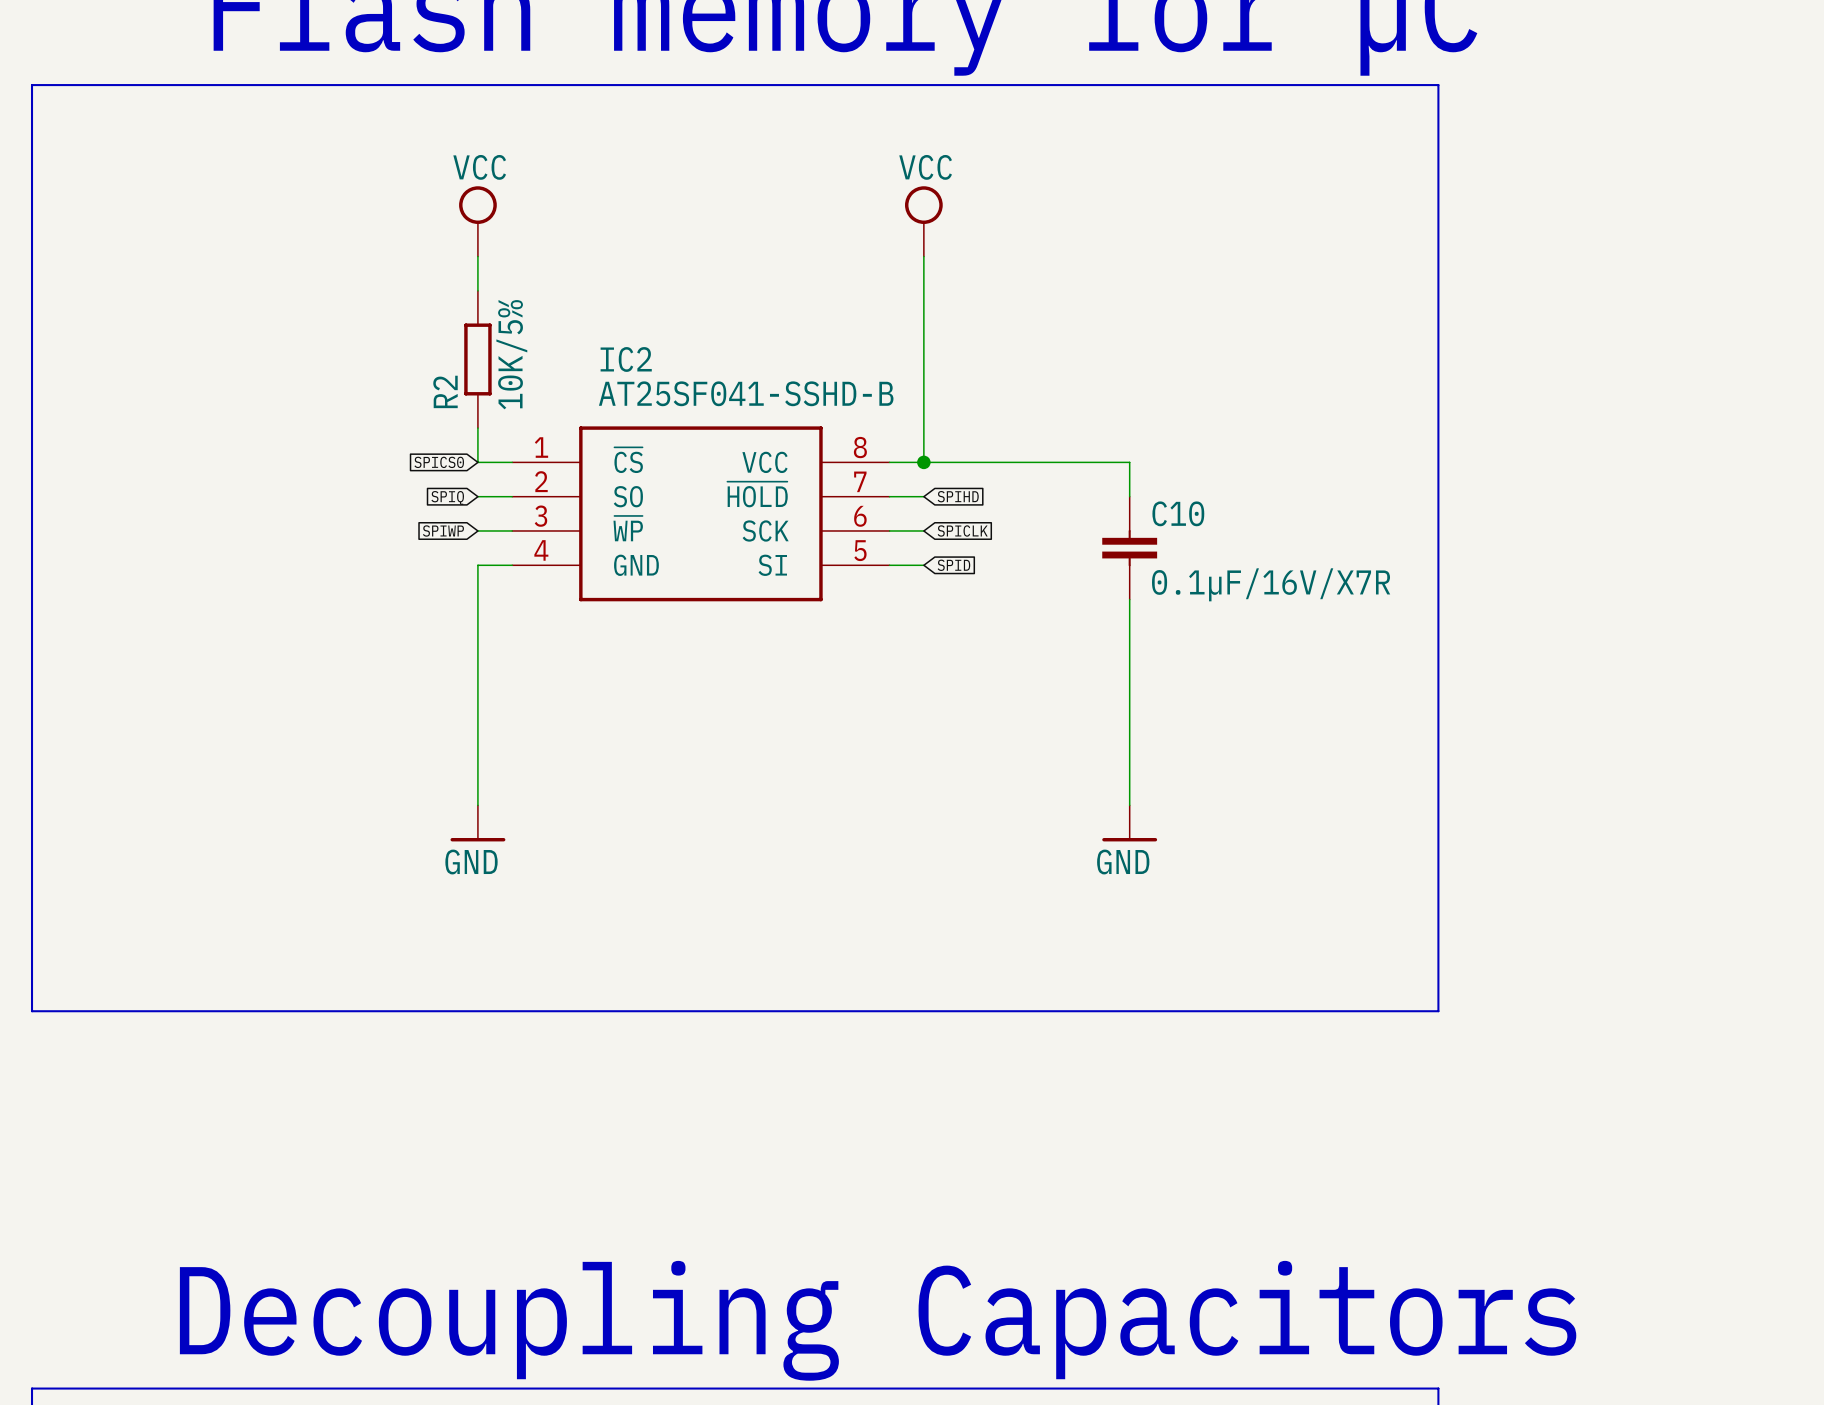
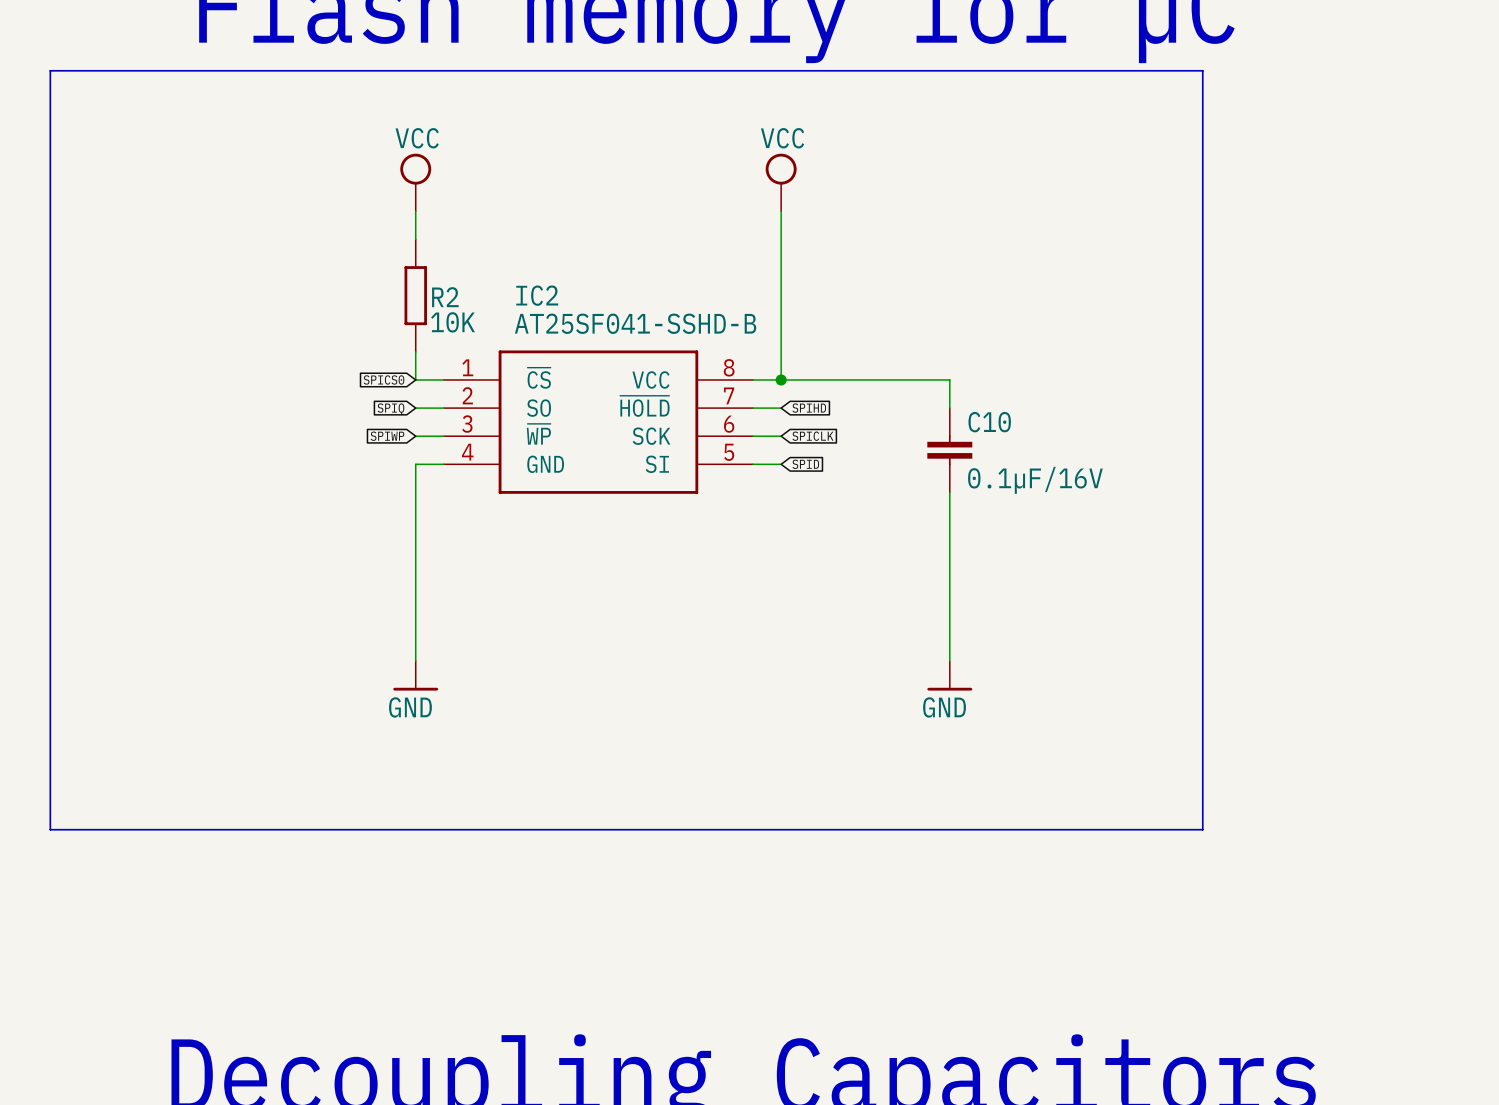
R2 value: 10K/5% (511, 354) -> 10K (453, 322)
R2 name rotation: 0° (445, 391) -> 90° clockwise (445, 297)
R2 name position: R2 (445, 391) -> R2 (445, 297)
C10 value: 0.1µF/16V/X7R (1271, 584) -> 0.1µF/16V (1035, 480)

